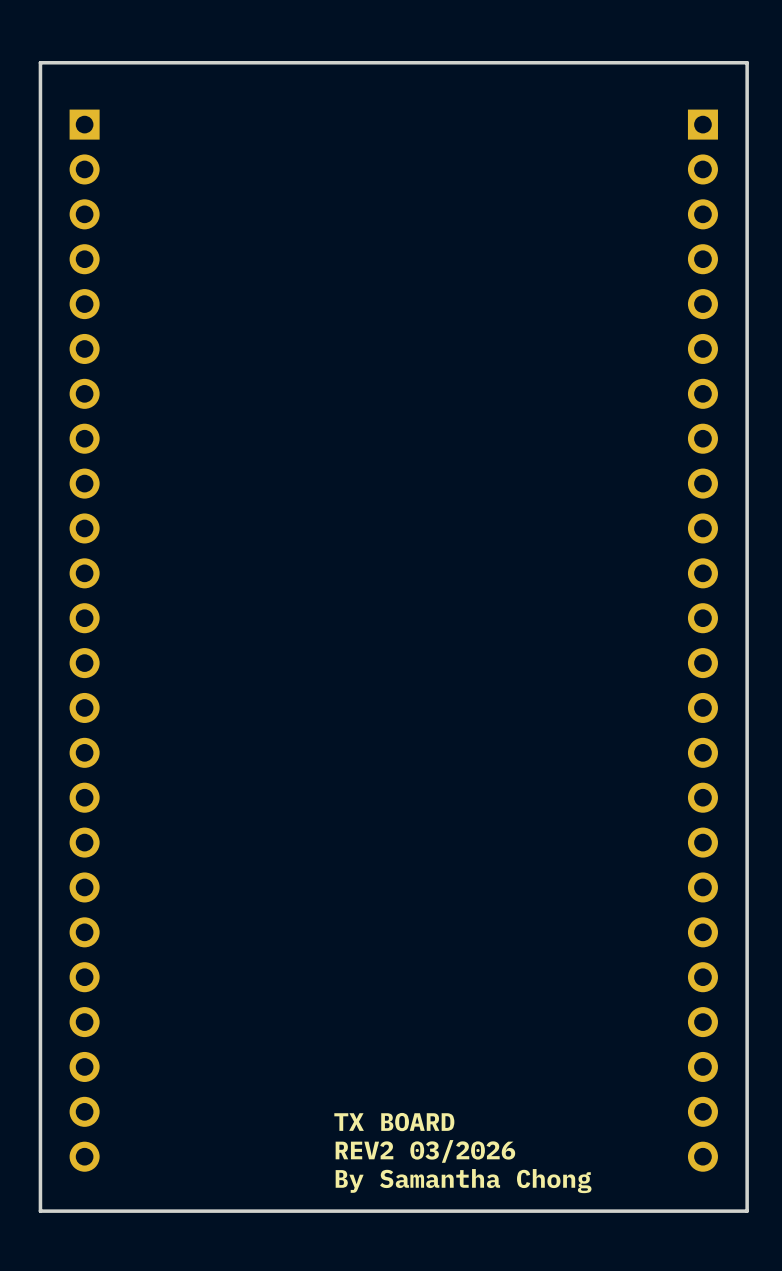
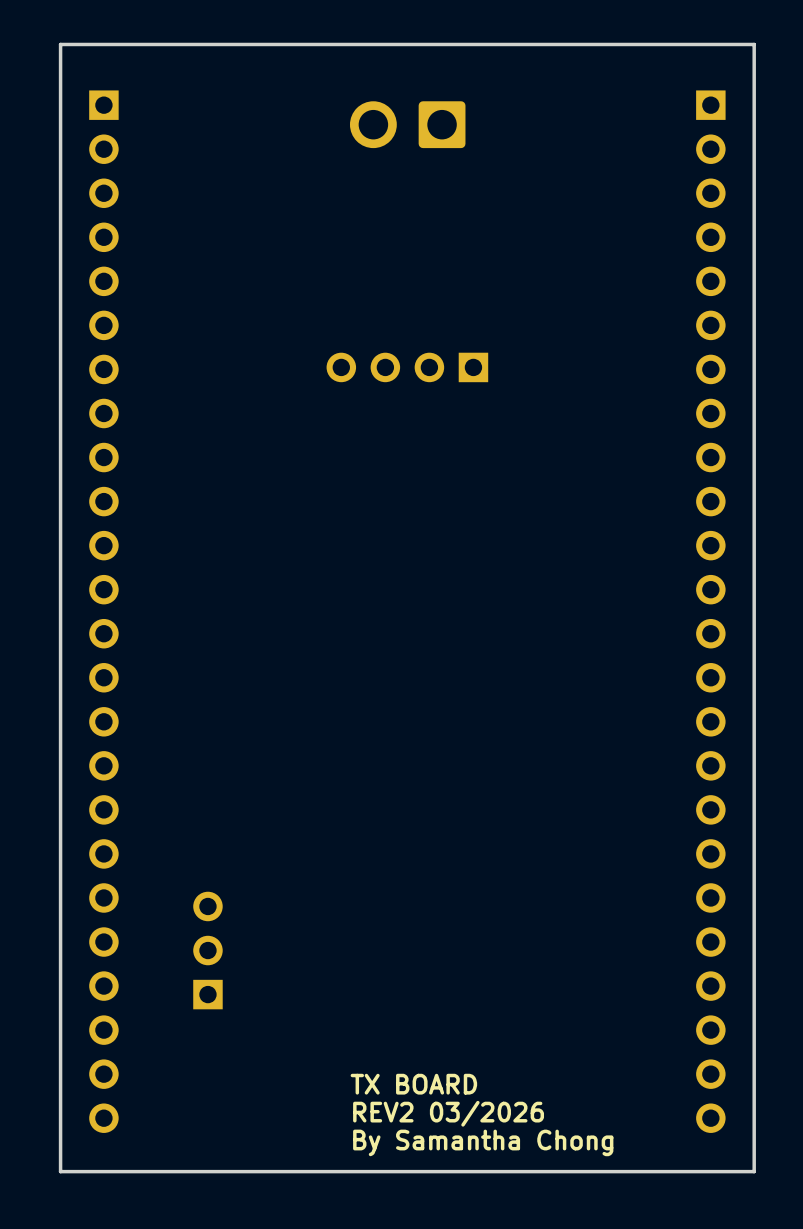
part: none -> (407, 124)
part: none -> (407, 367)
part: none -> (207, 950)

